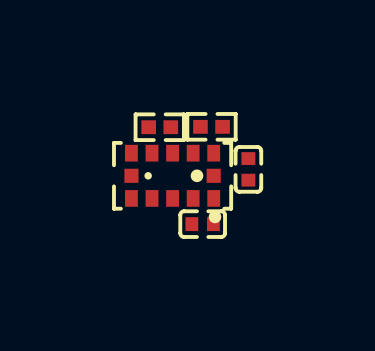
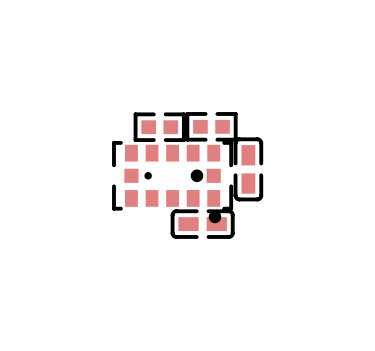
part footprint: [233, 145, 264, 194] -> [233, 137, 264, 202]
part footprint: [178, 209, 227, 239] -> [170, 209, 235, 239]

